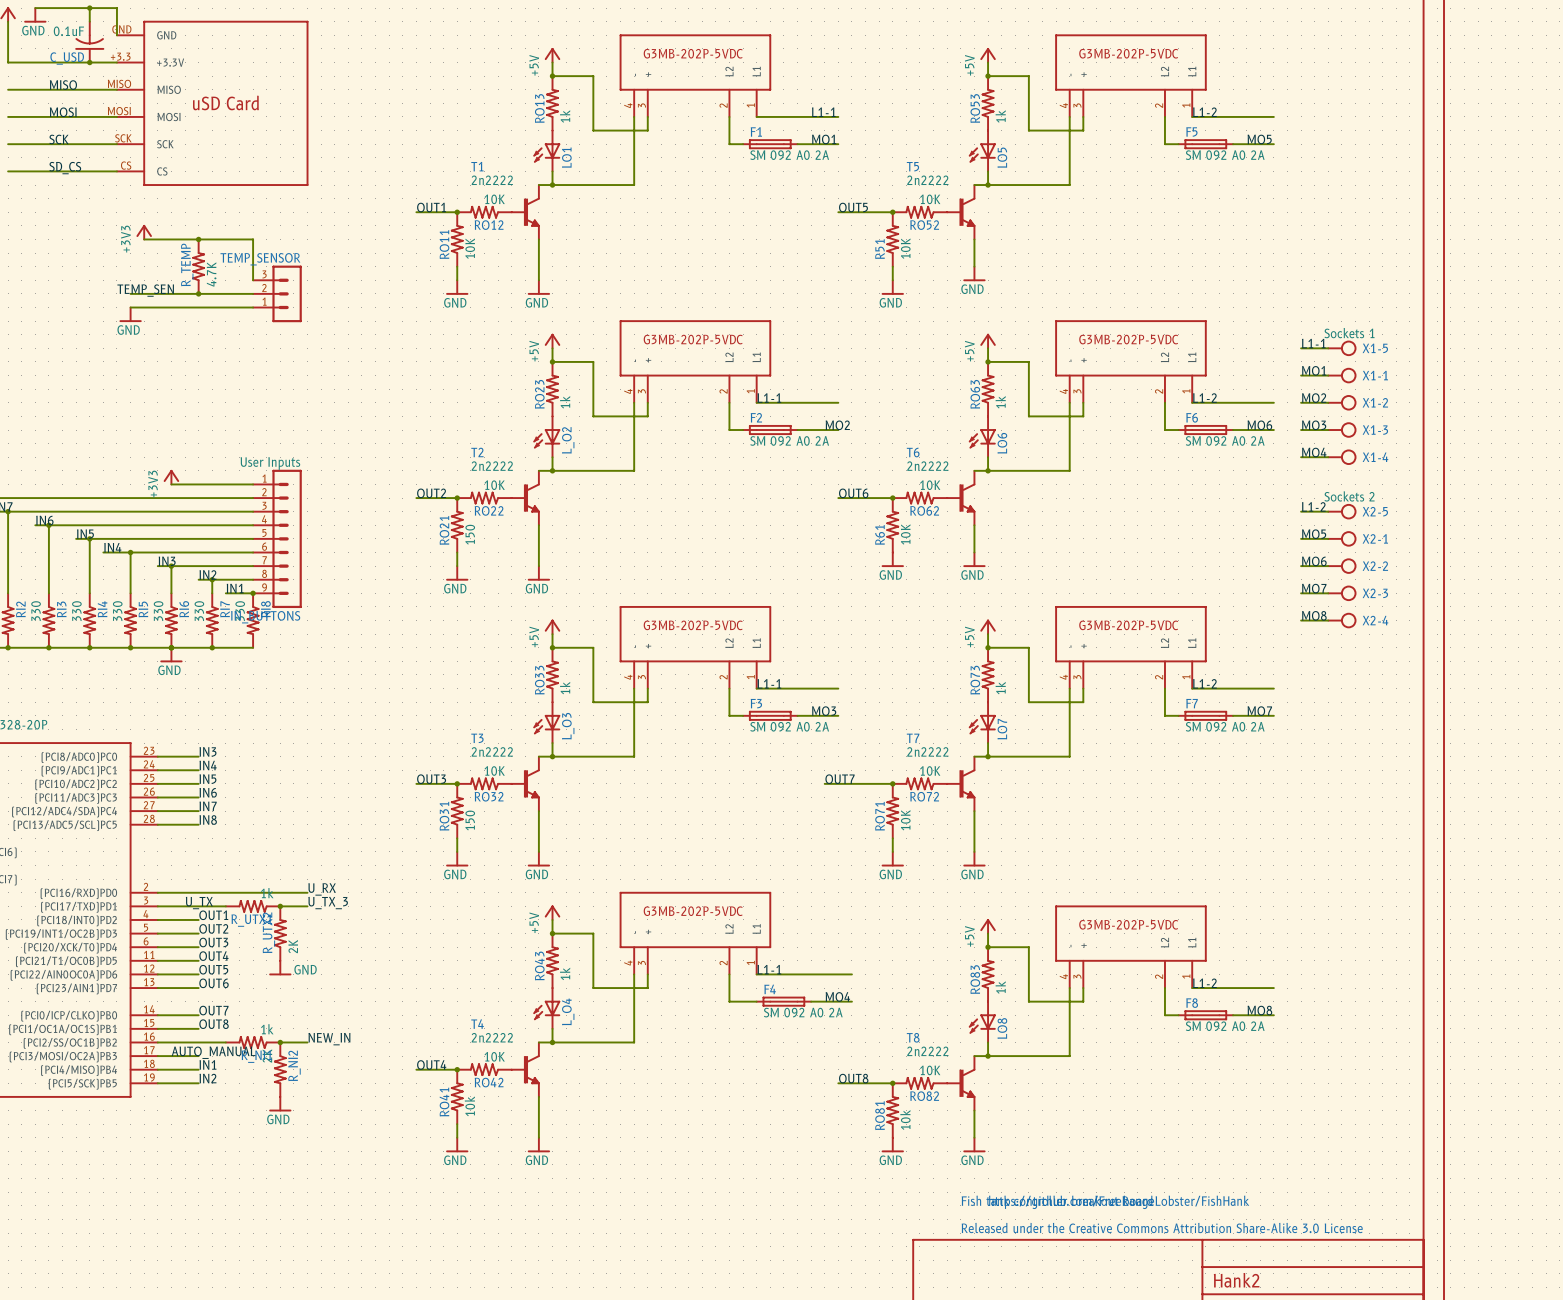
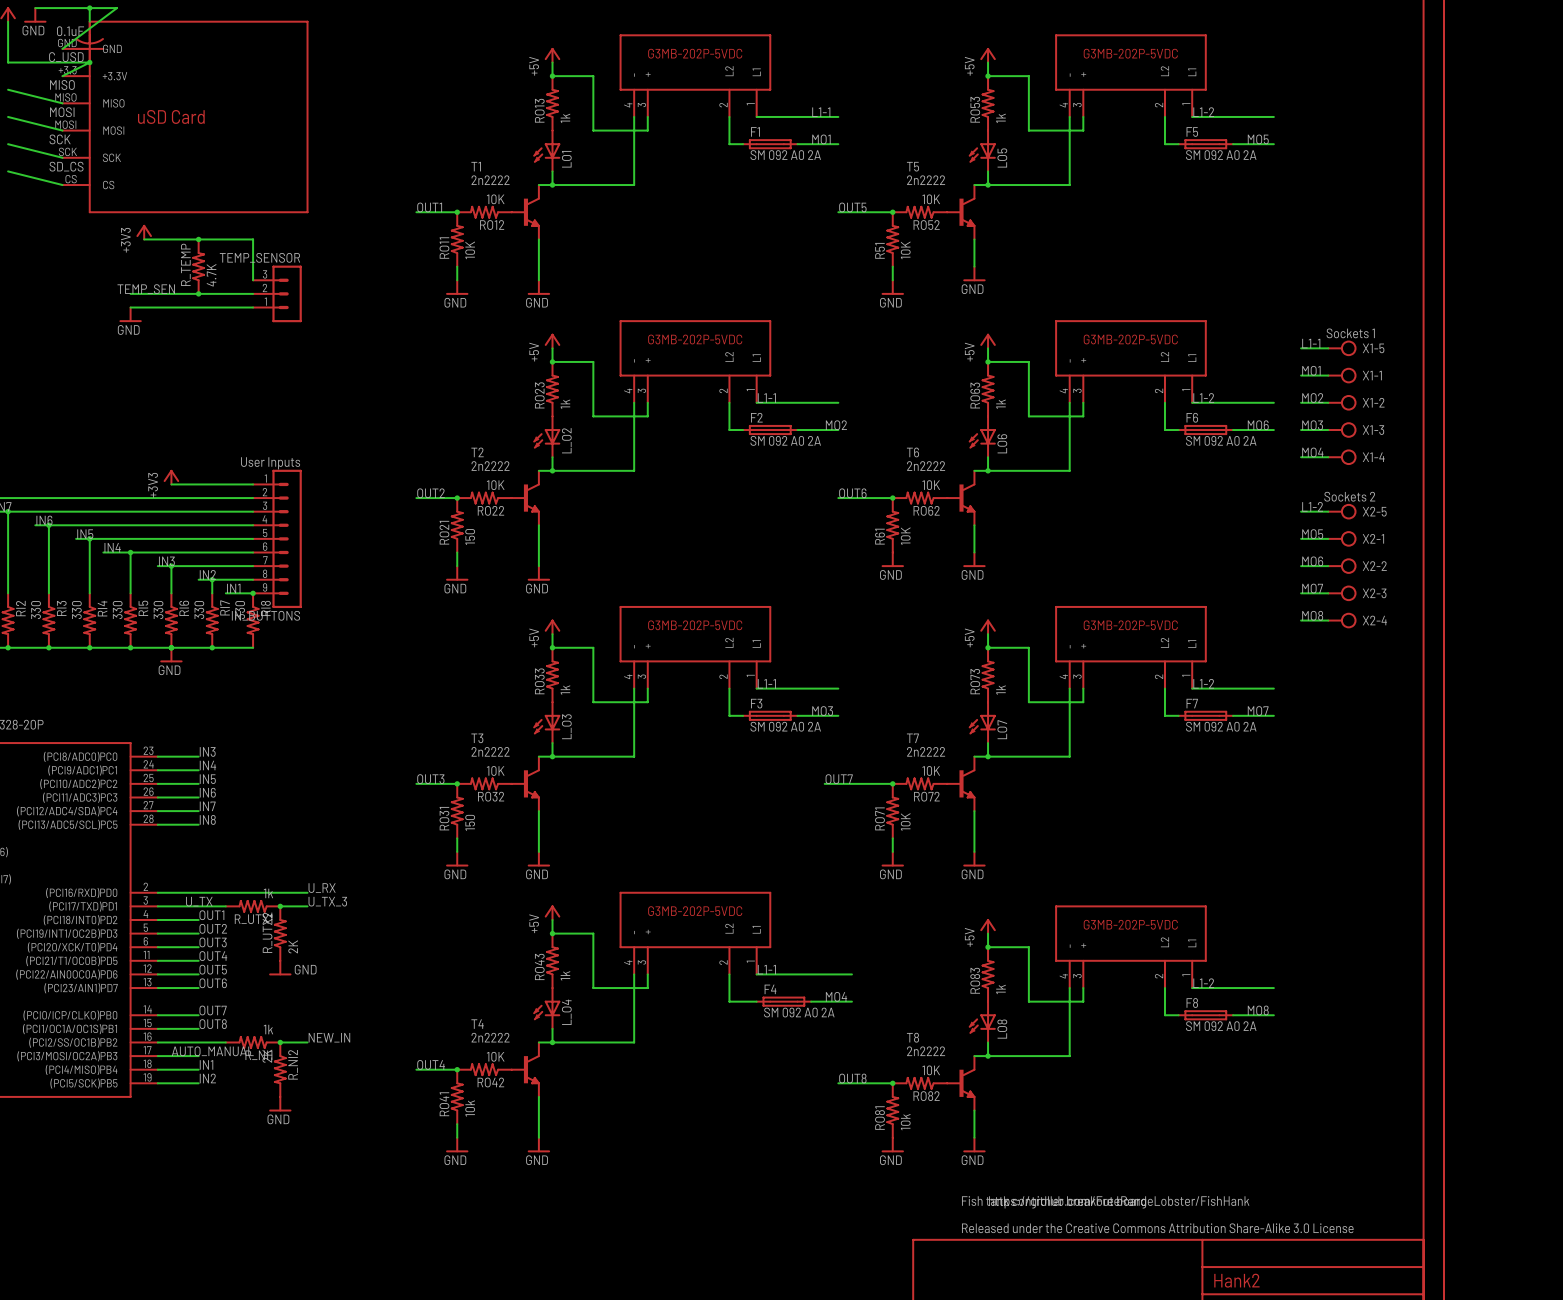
wire: (116, 8) (116, 35) -> (116, 8) (62, 48)
wire: (89, 62) (116, 62) -> (89, 62) (62, 76)
wire: (8, 89) (116, 89) -> (8, 89) (62, 103)
part: (212, 103) -> none
wire: (8, 116) (116, 116) -> (8, 116) (62, 130)
part: none -> (185, 116)
wire: (8, 144) (116, 144) -> (8, 144) (62, 157)
wire: (8, 171) (116, 171) -> (8, 171) (62, 185)

